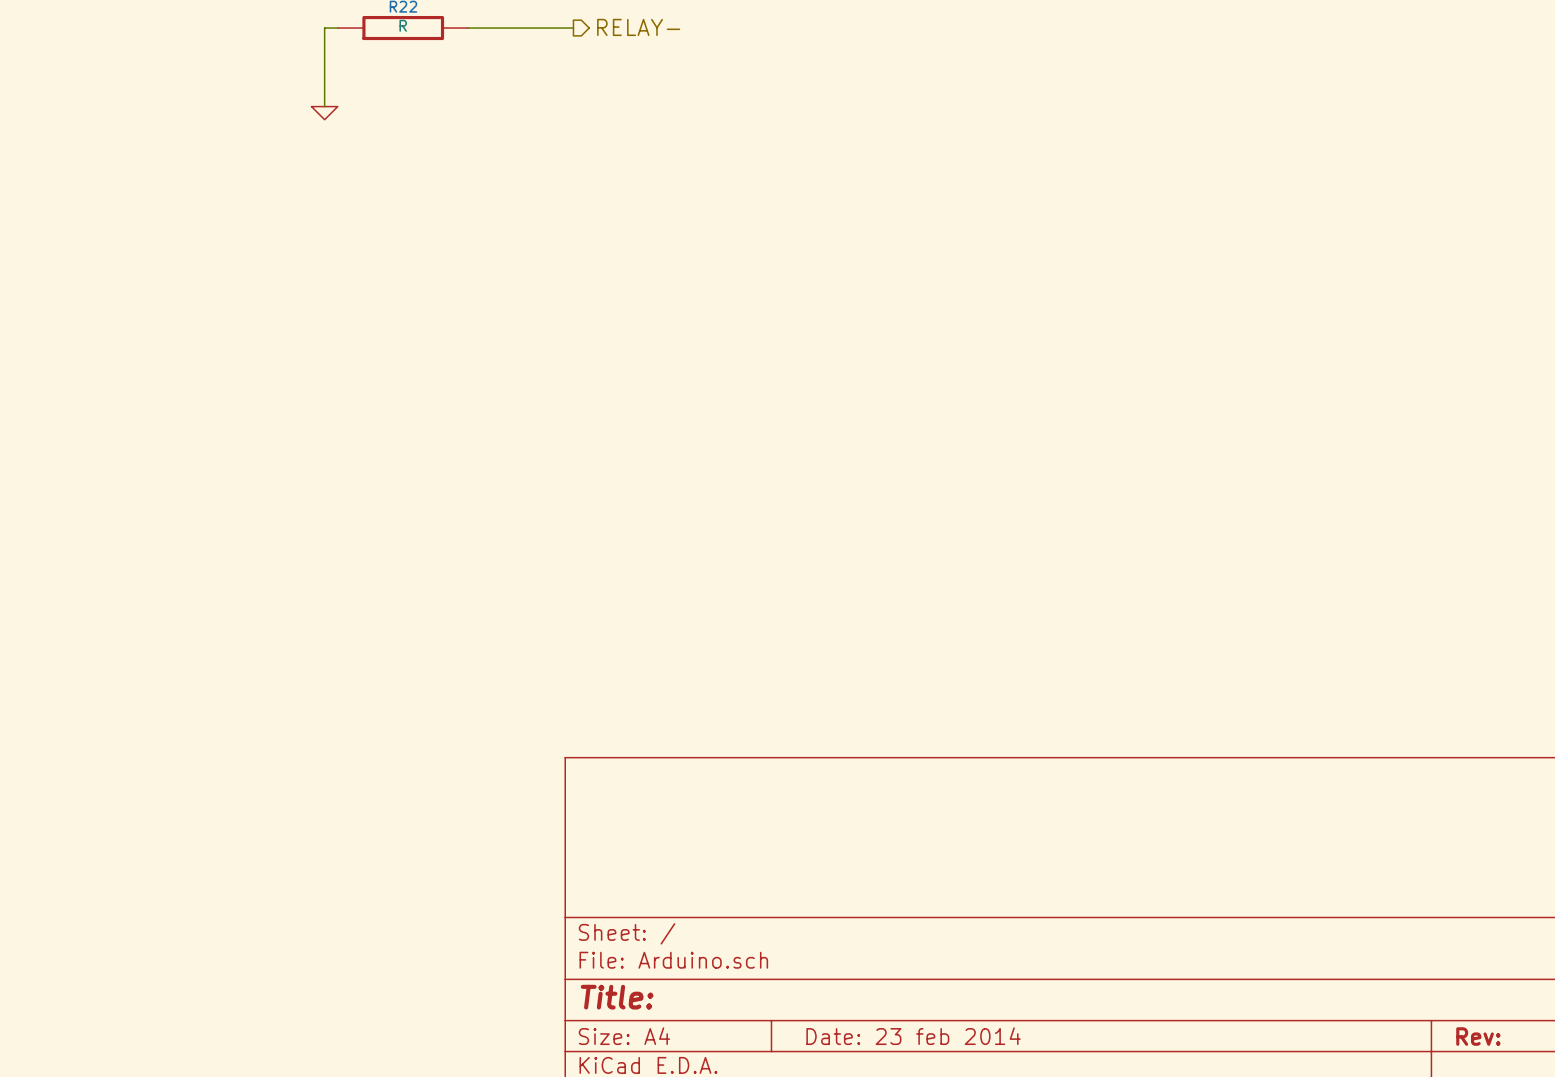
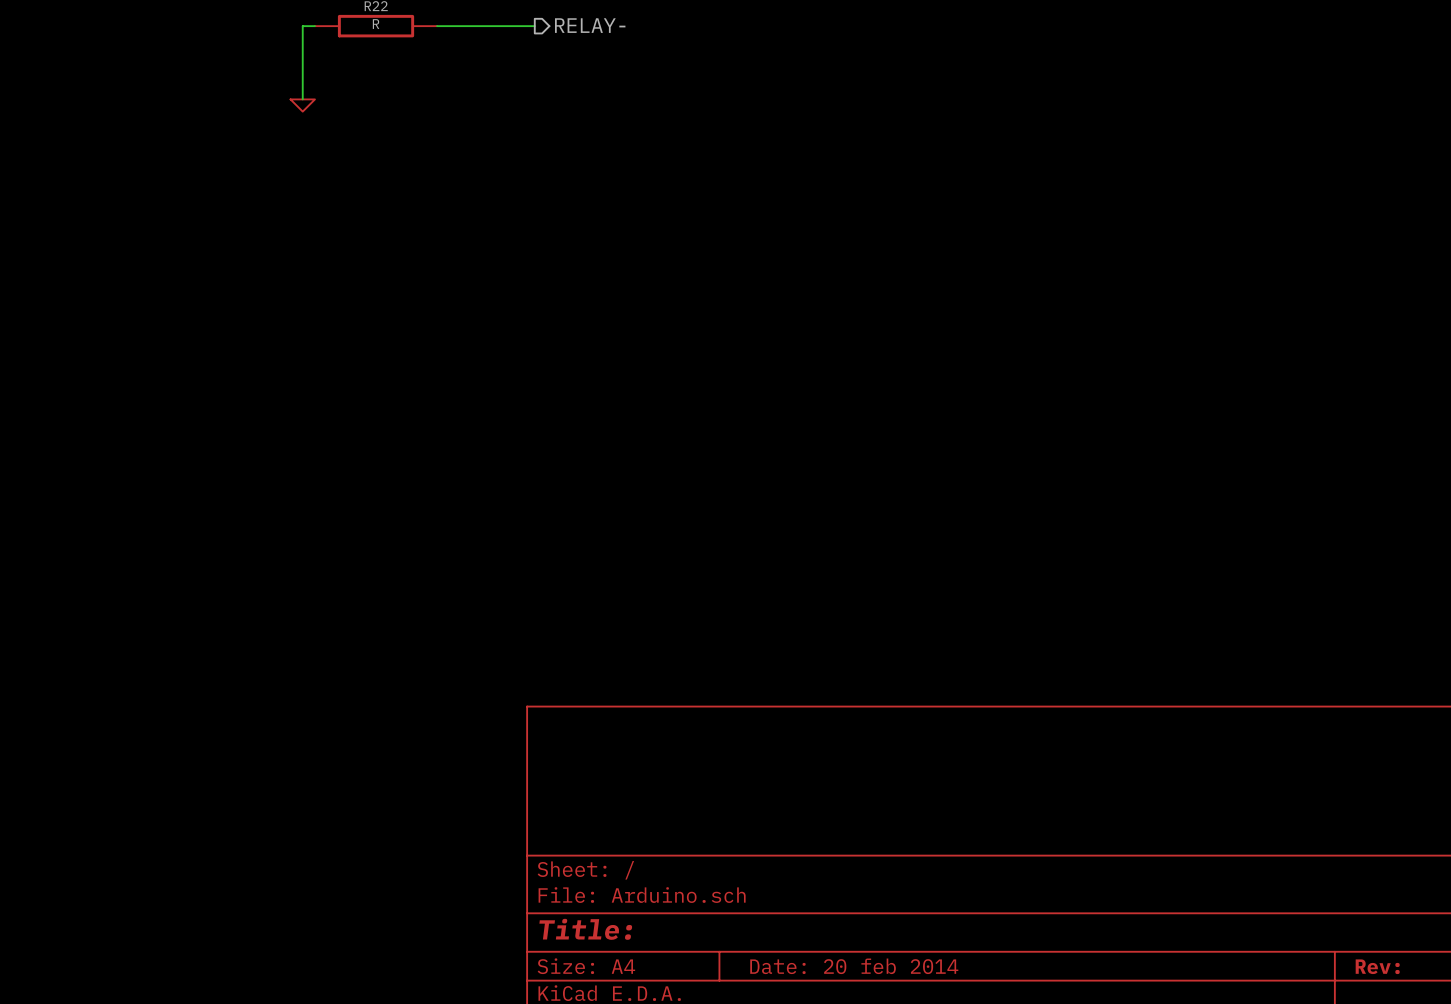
title block: Date: 23 feb 2014 (913, 1036) -> Date: 20 feb 2014 (854, 966)

